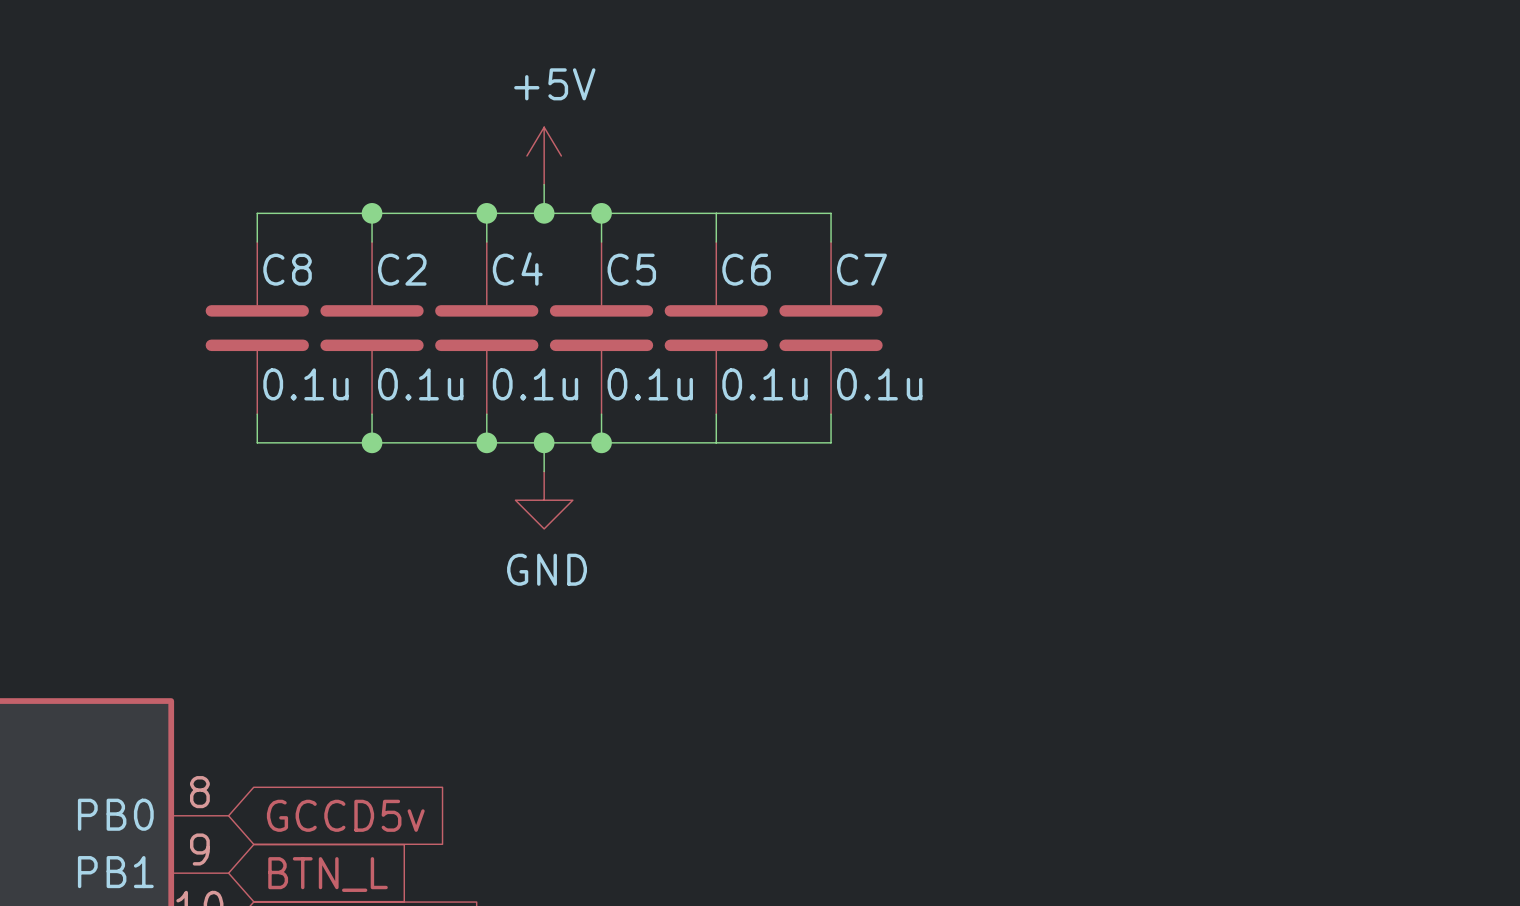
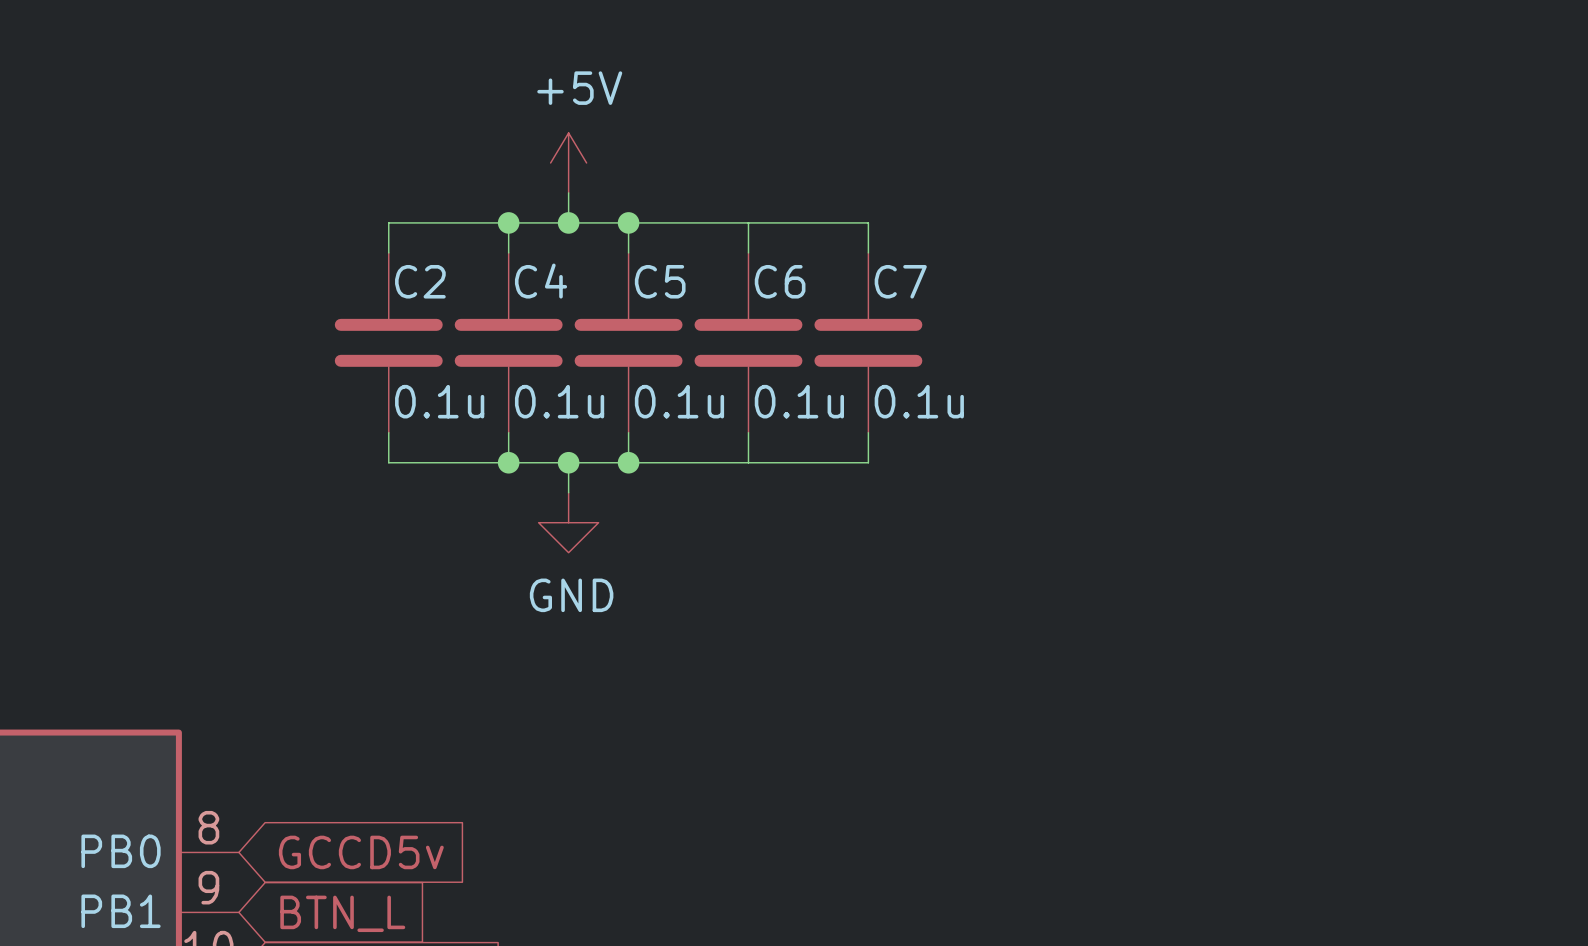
wire: (372, 213) (257, 213) (257, 242) -> none
junction: (372, 213) -> none
C8: 0.1u (257, 328) -> none
wire: (257, 414) (257, 442) (372, 442) -> none
junction: (372, 442) -> none

